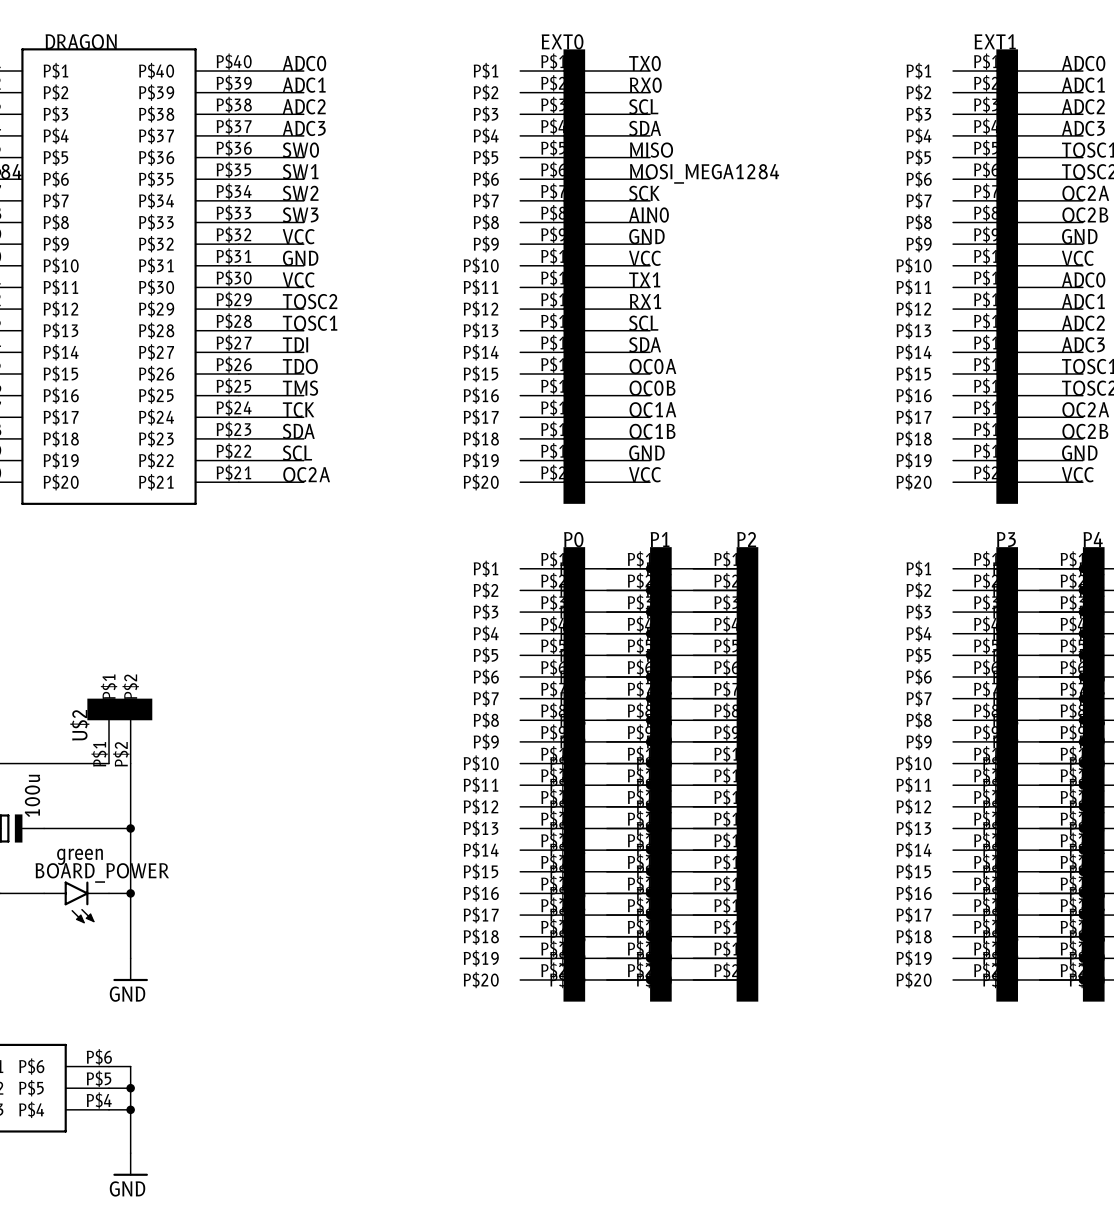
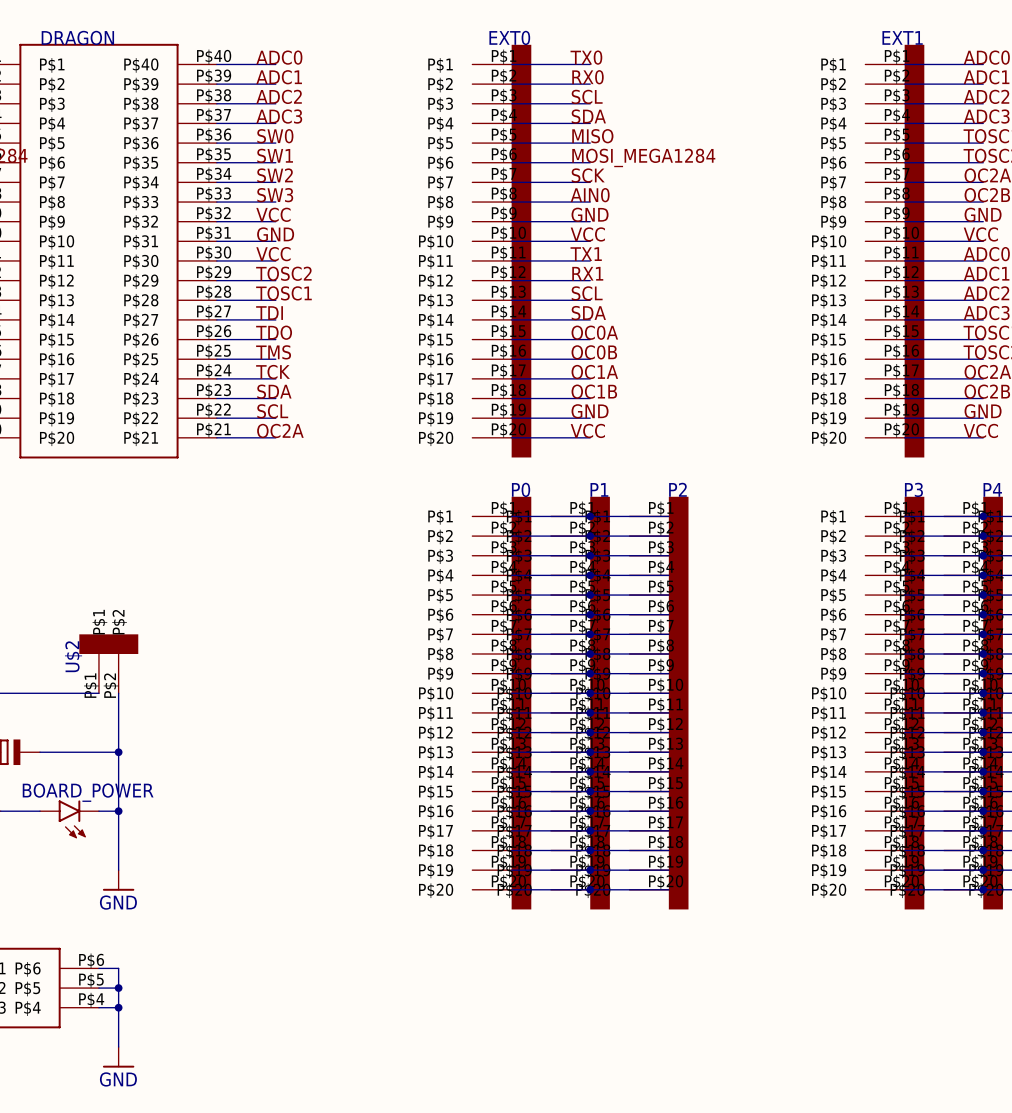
part value: 100u (32, 795) -> none
BOARD_POWER value: green (80, 856) -> none

